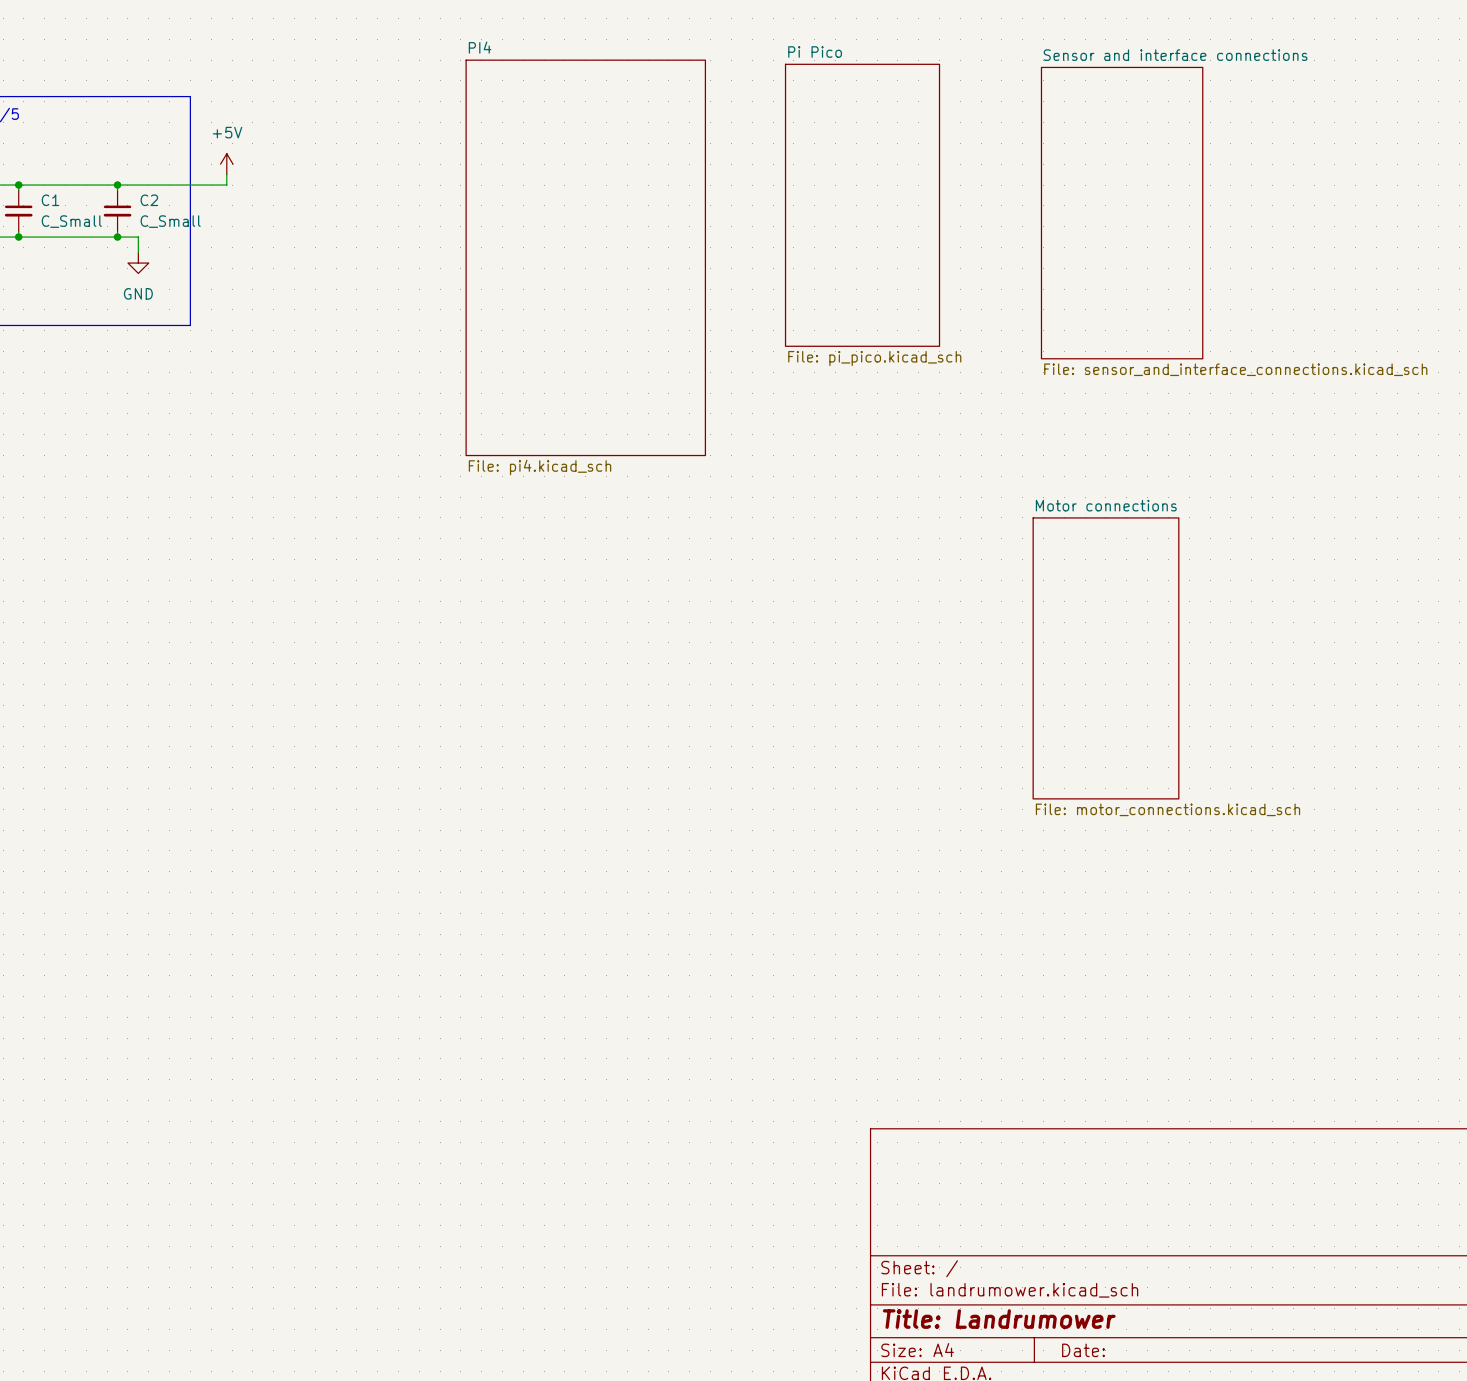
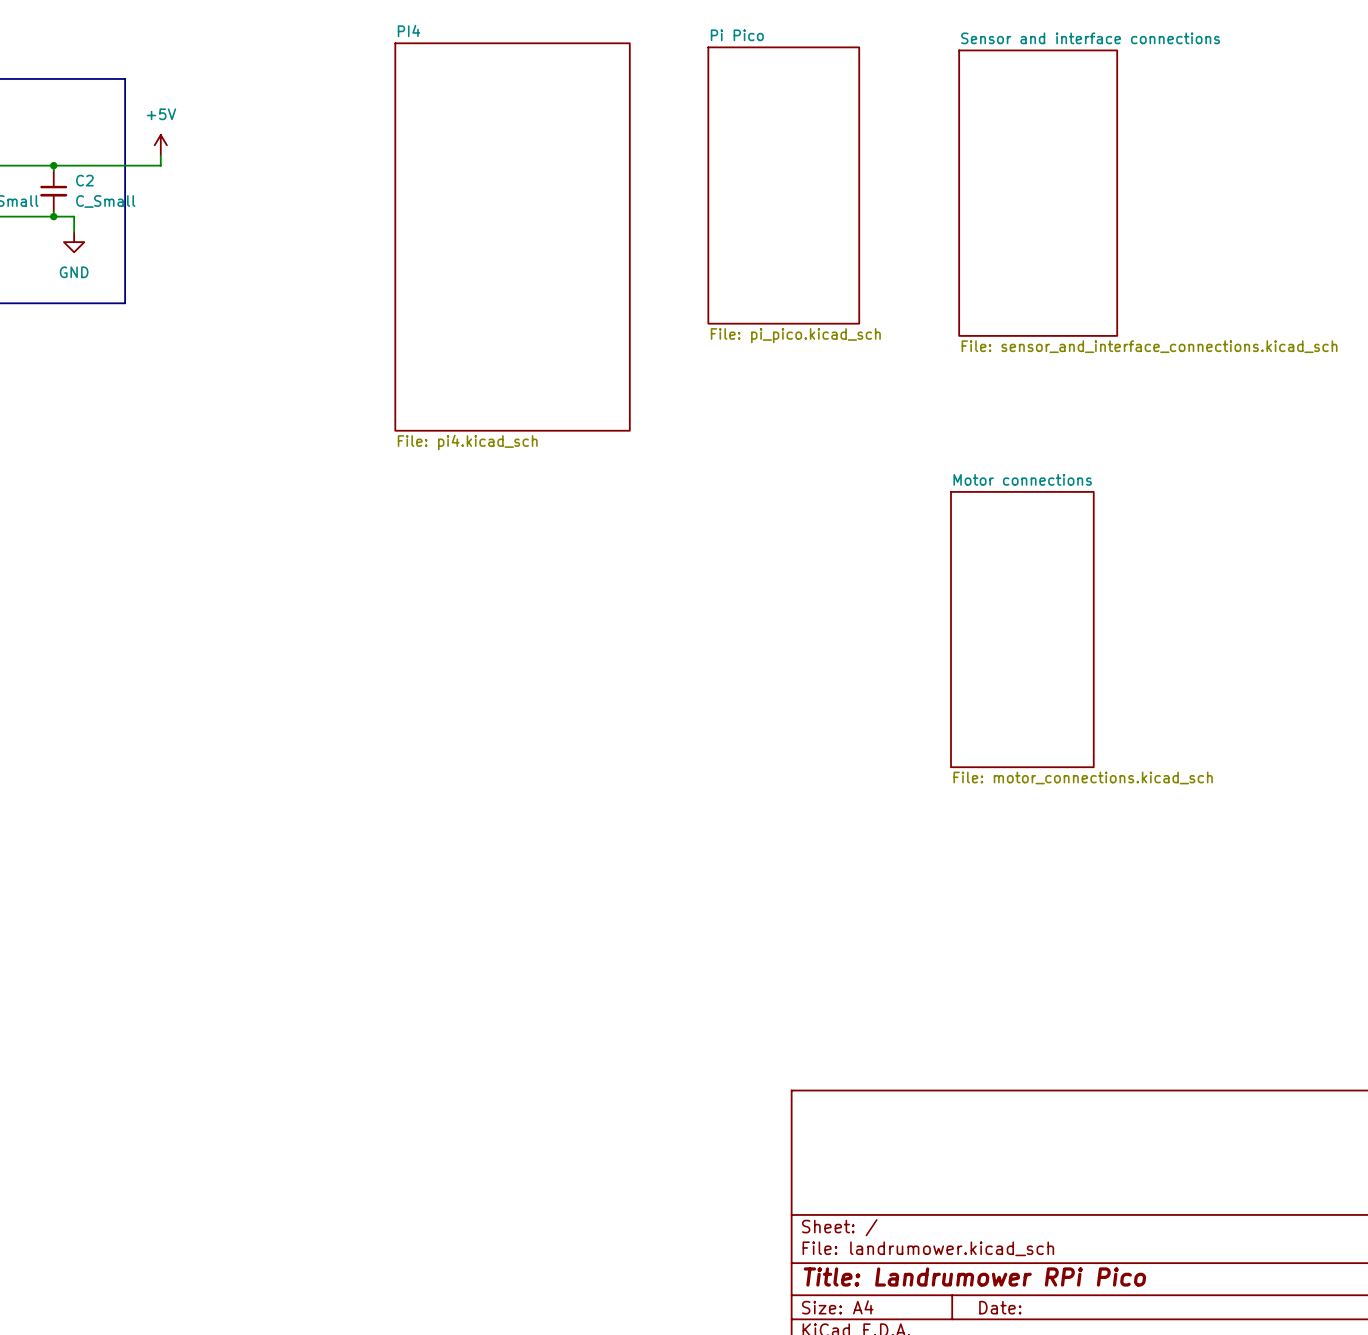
title block: Title: Landrumower (999, 1319) -> Title: Landrumower RPi Pico (974, 1276)

